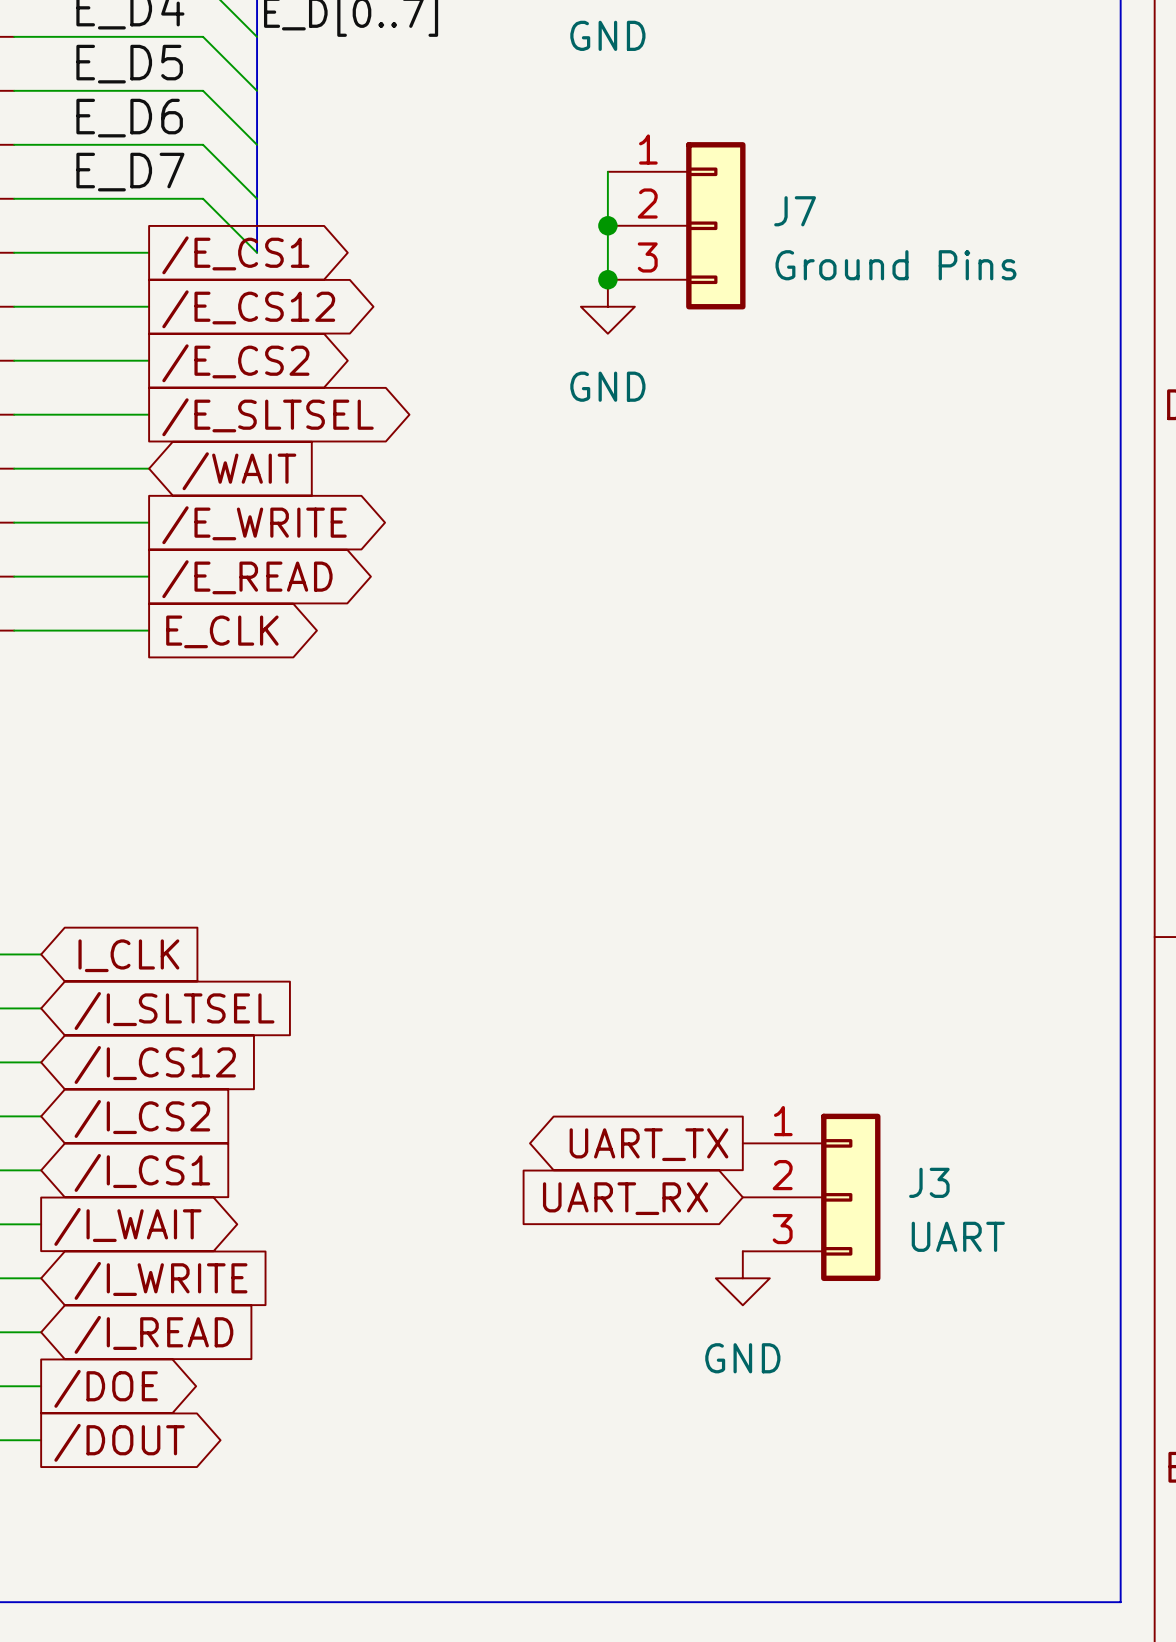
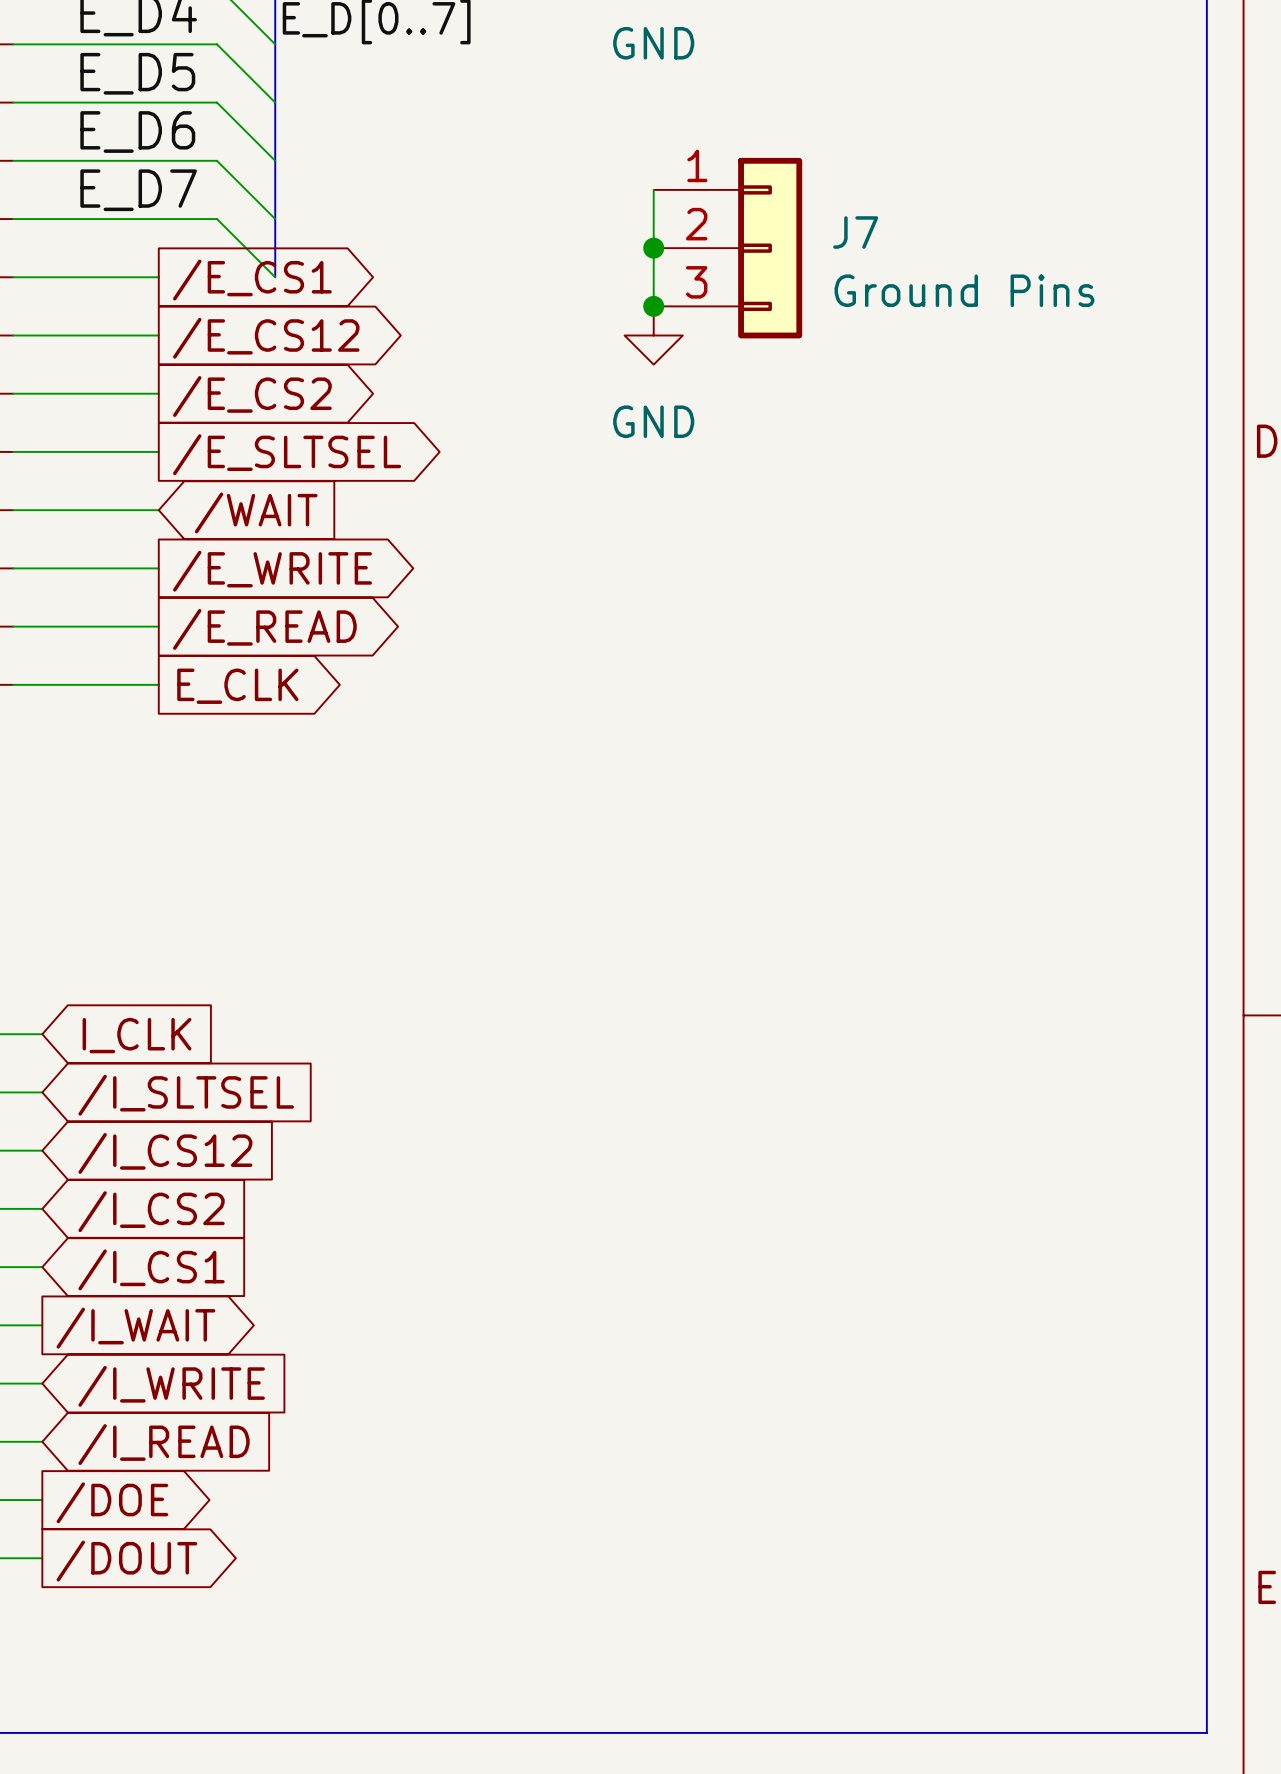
global label: UART_TX (648, 1144) -> none
J3: UART (811, 1197) -> none
global label: UART_RX (625, 1198) -> none
power symbol: GND (742, 1278) -> none

